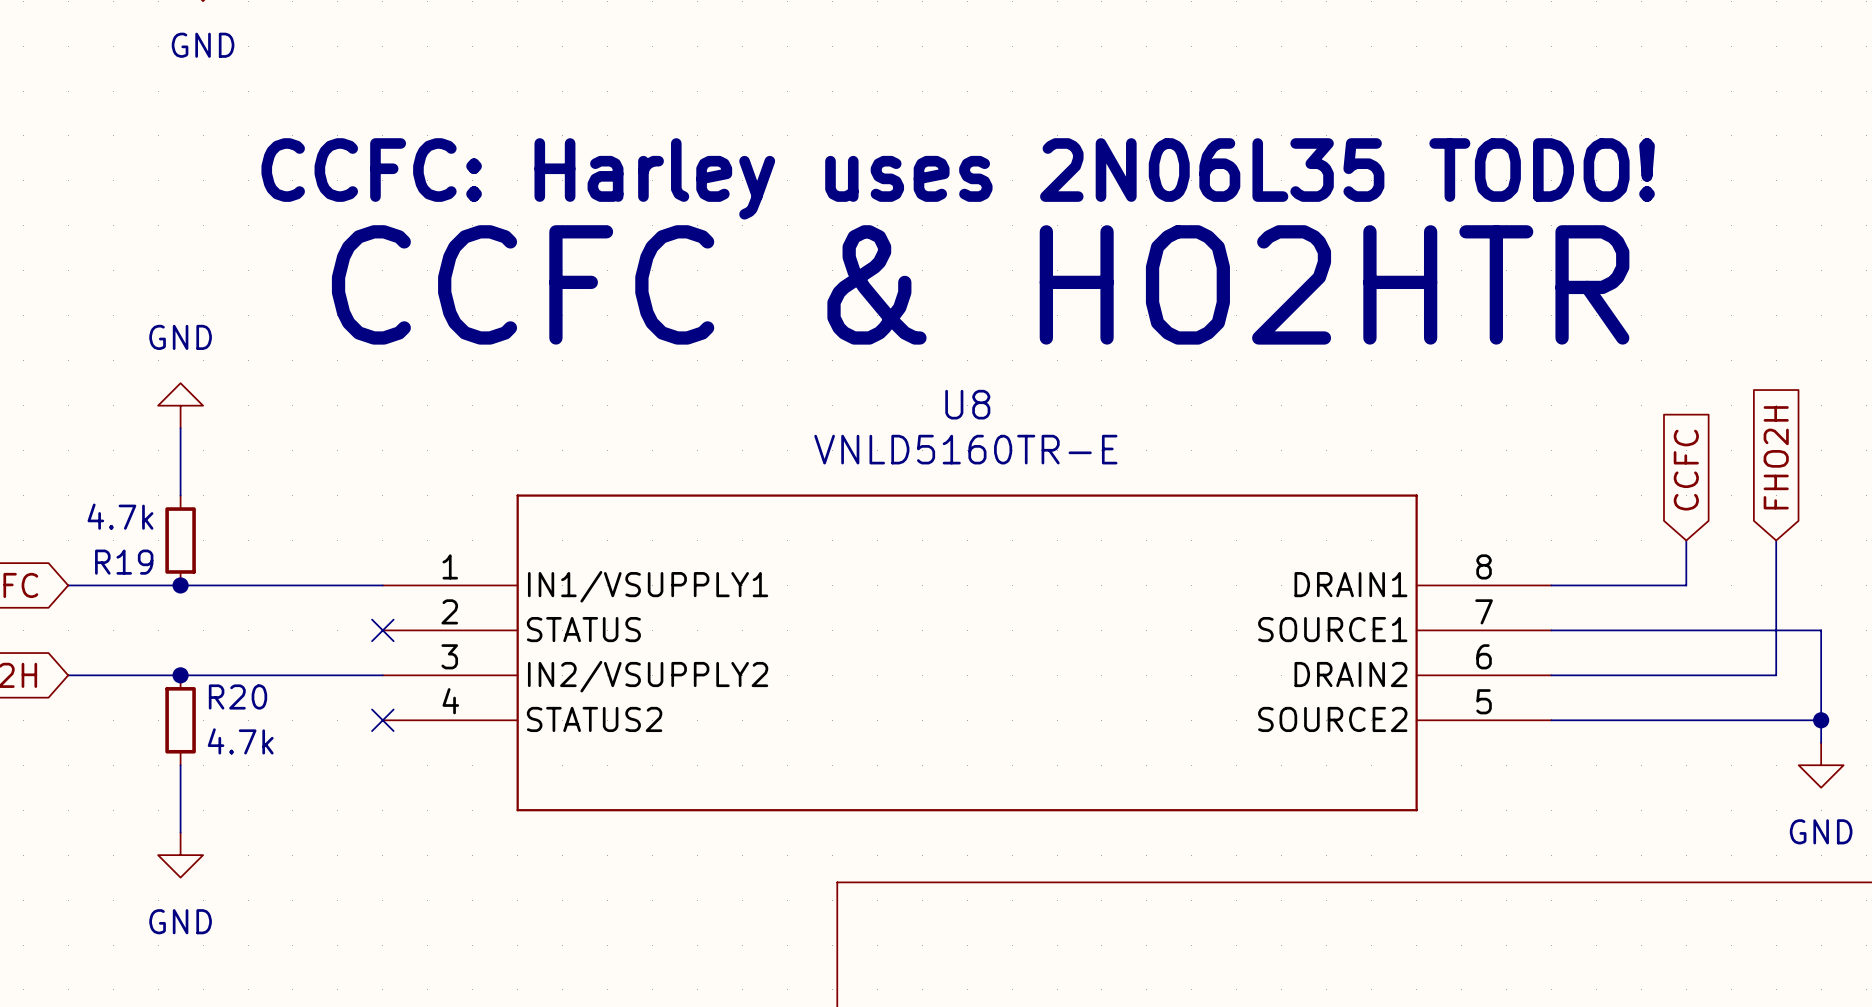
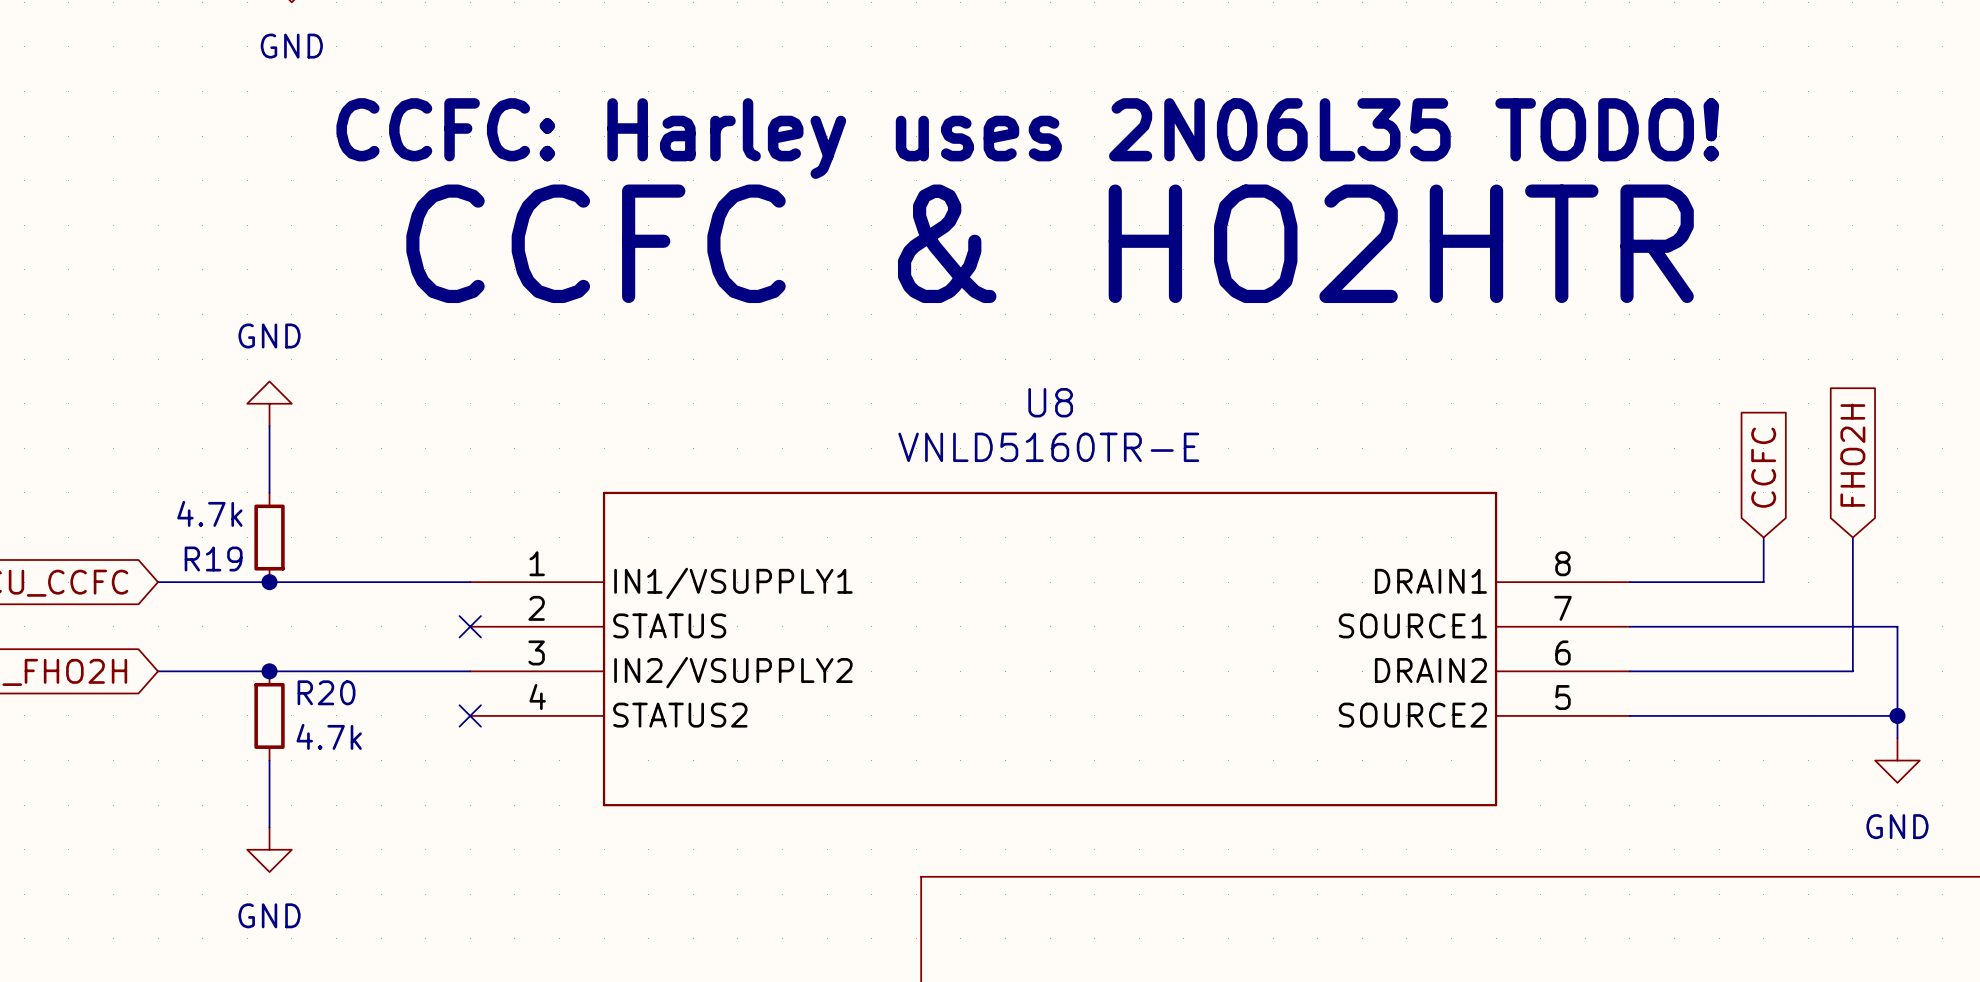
text position: CCFC: Harley uses 2N06L35 TODO! (958, 178) -> CCFC: Harley uses 2N06L35 TODO! (1027, 138)
text position: CCFC & HO2HTR (980, 284) -> CCFC & HO2HTR (1050, 243)

